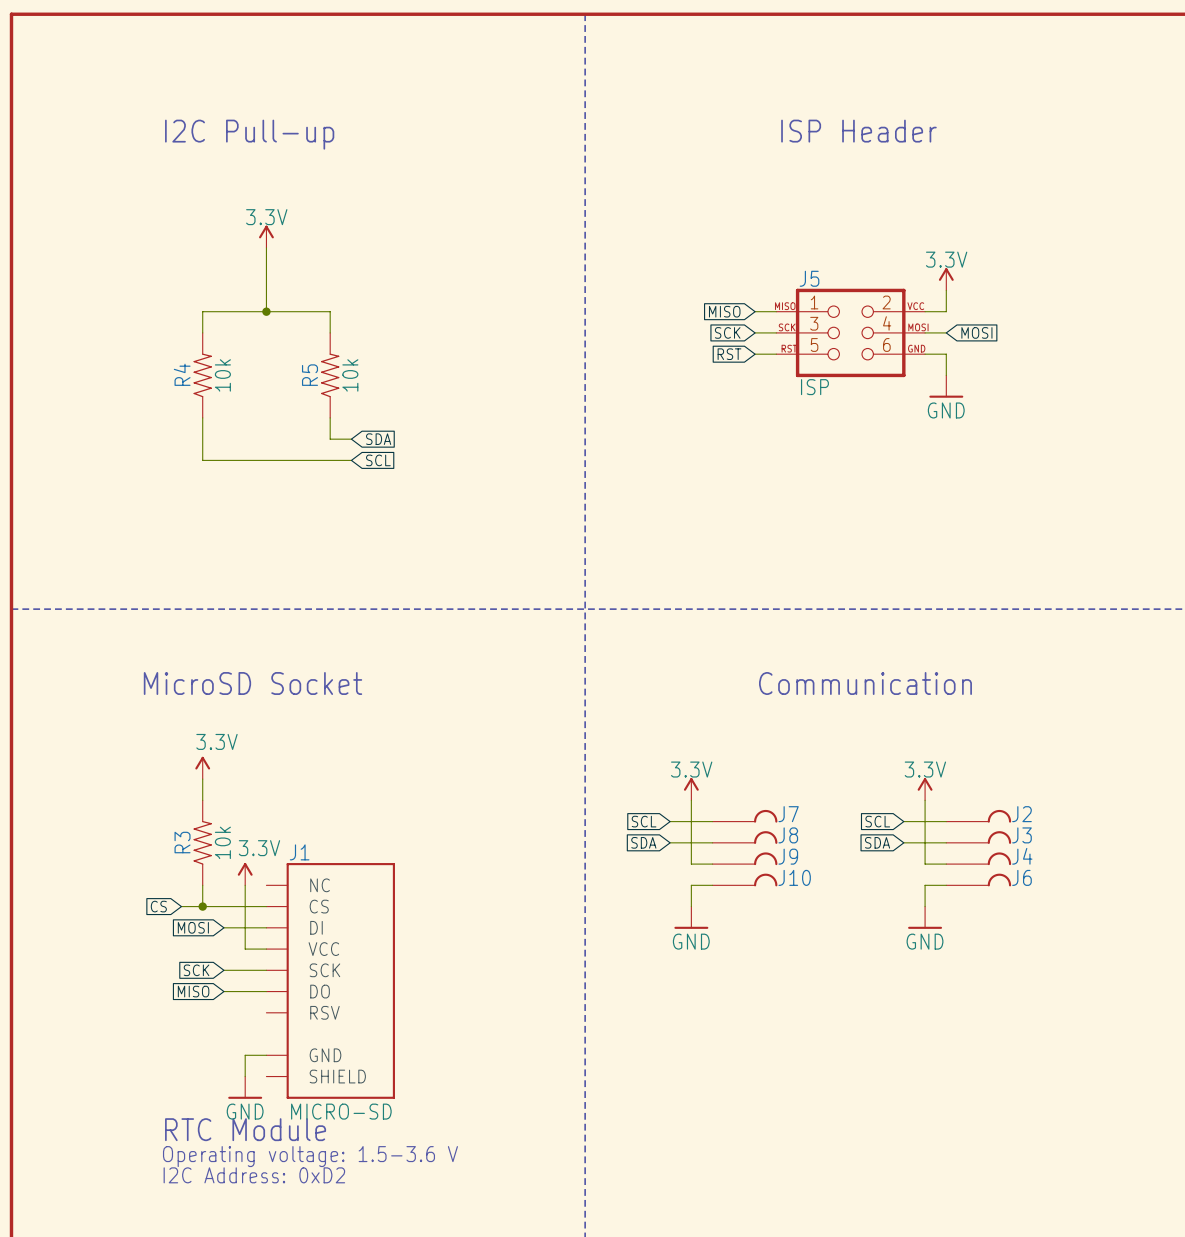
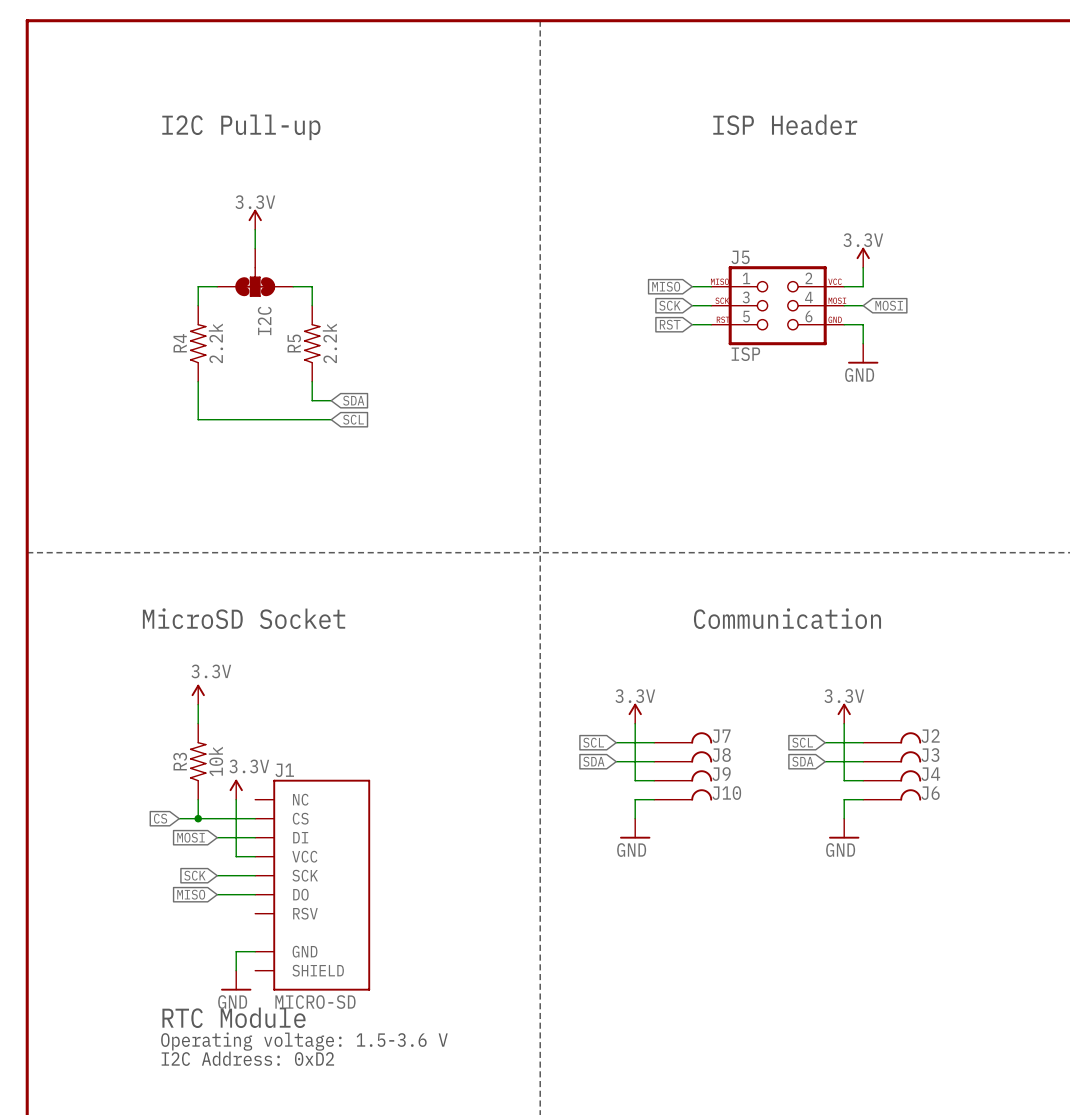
I2C: none -> (255, 272)
junction: (266, 311) -> none
R4 value: 10k (222, 375) -> 2.2k (215, 343)
R5 value: 10k (350, 375) -> 2.2k (329, 343)

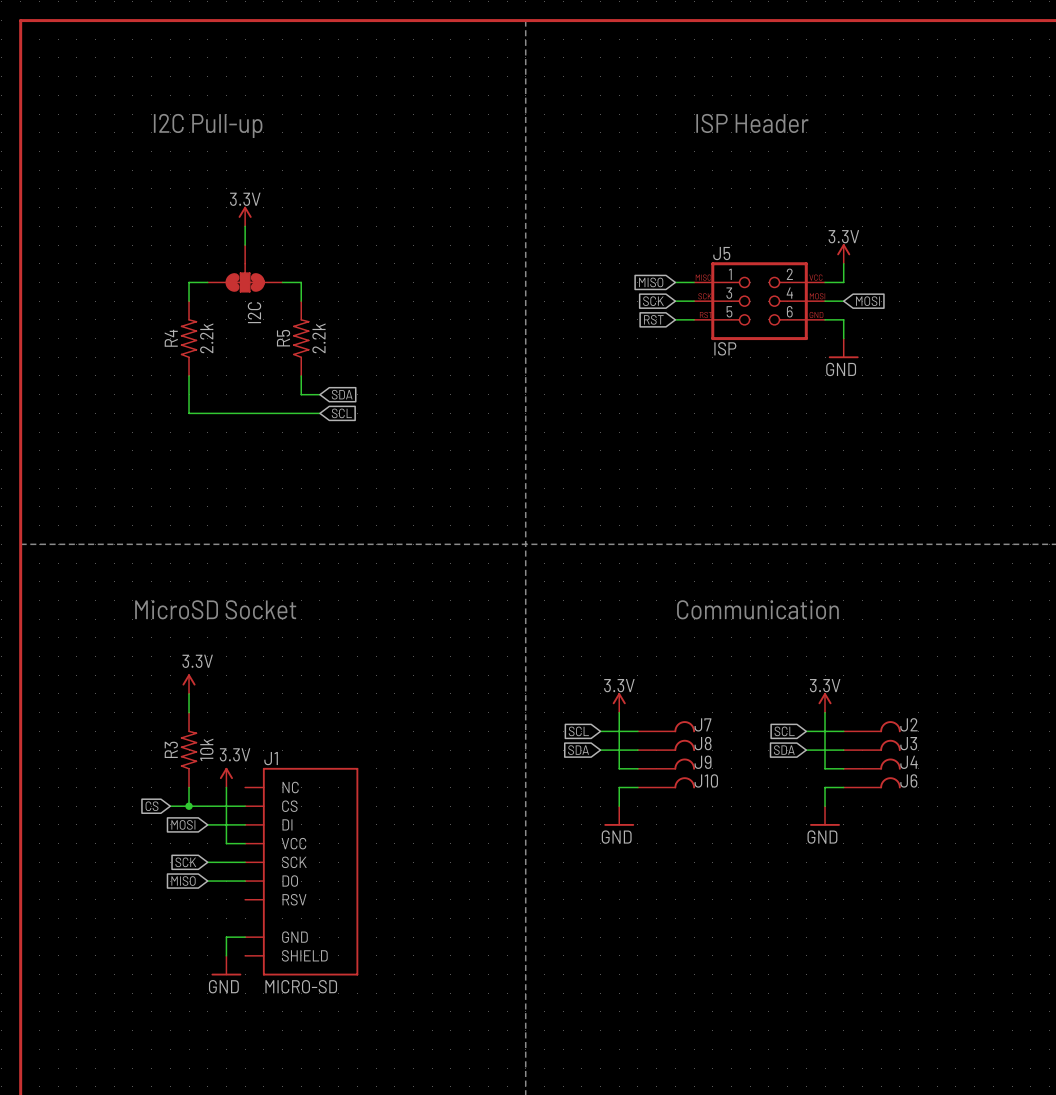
text: RTC Module (234, 1017) -> none
text: Operating voltage: 1.5-3.6 V (304, 1041) -> none
text: I2C Address: 0xD2 (247, 1058) -> none

